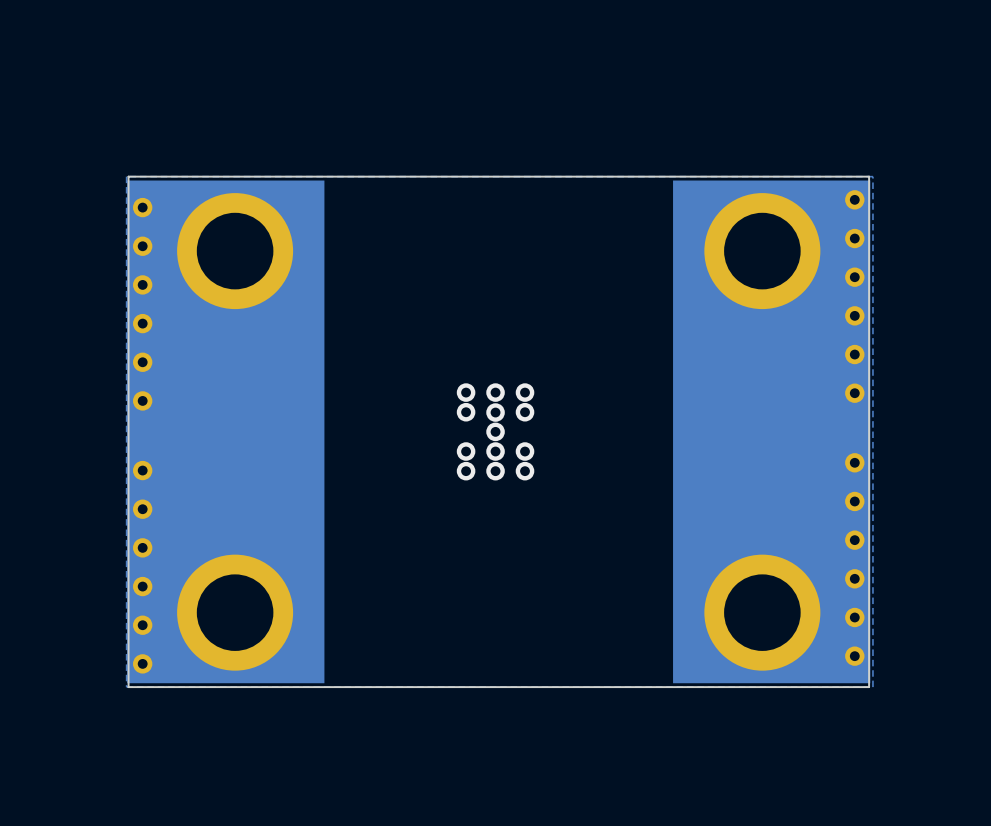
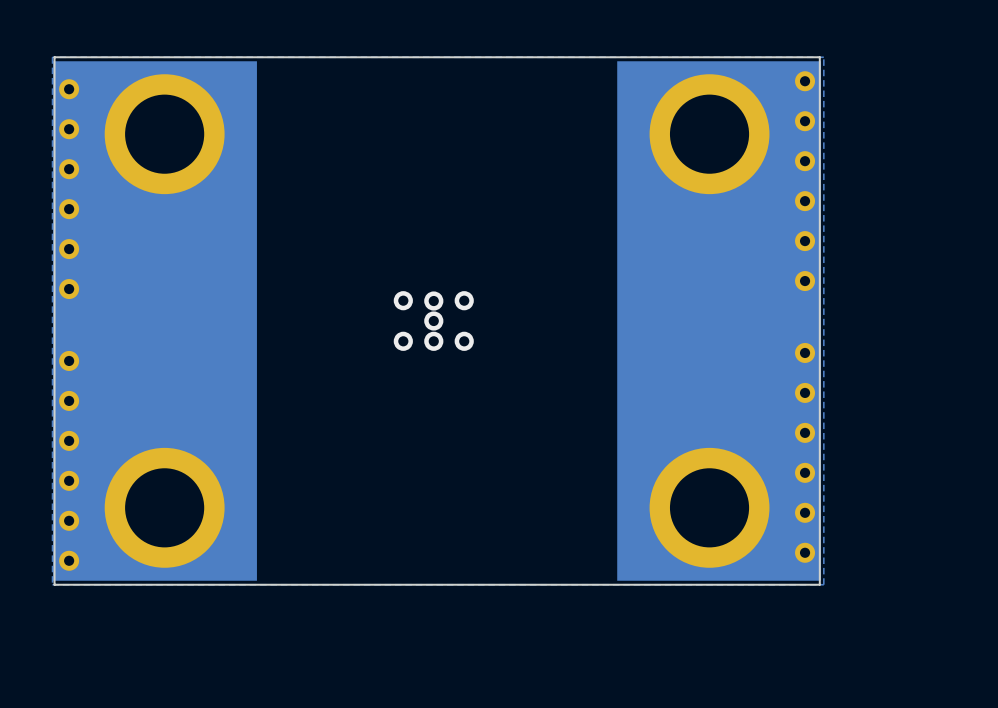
via: (466, 392) -> none
via: (495, 392) -> none
via: (525, 392) -> none
via: (466, 471) -> none
via: (495, 471) -> none
via: (525, 471) -> none

